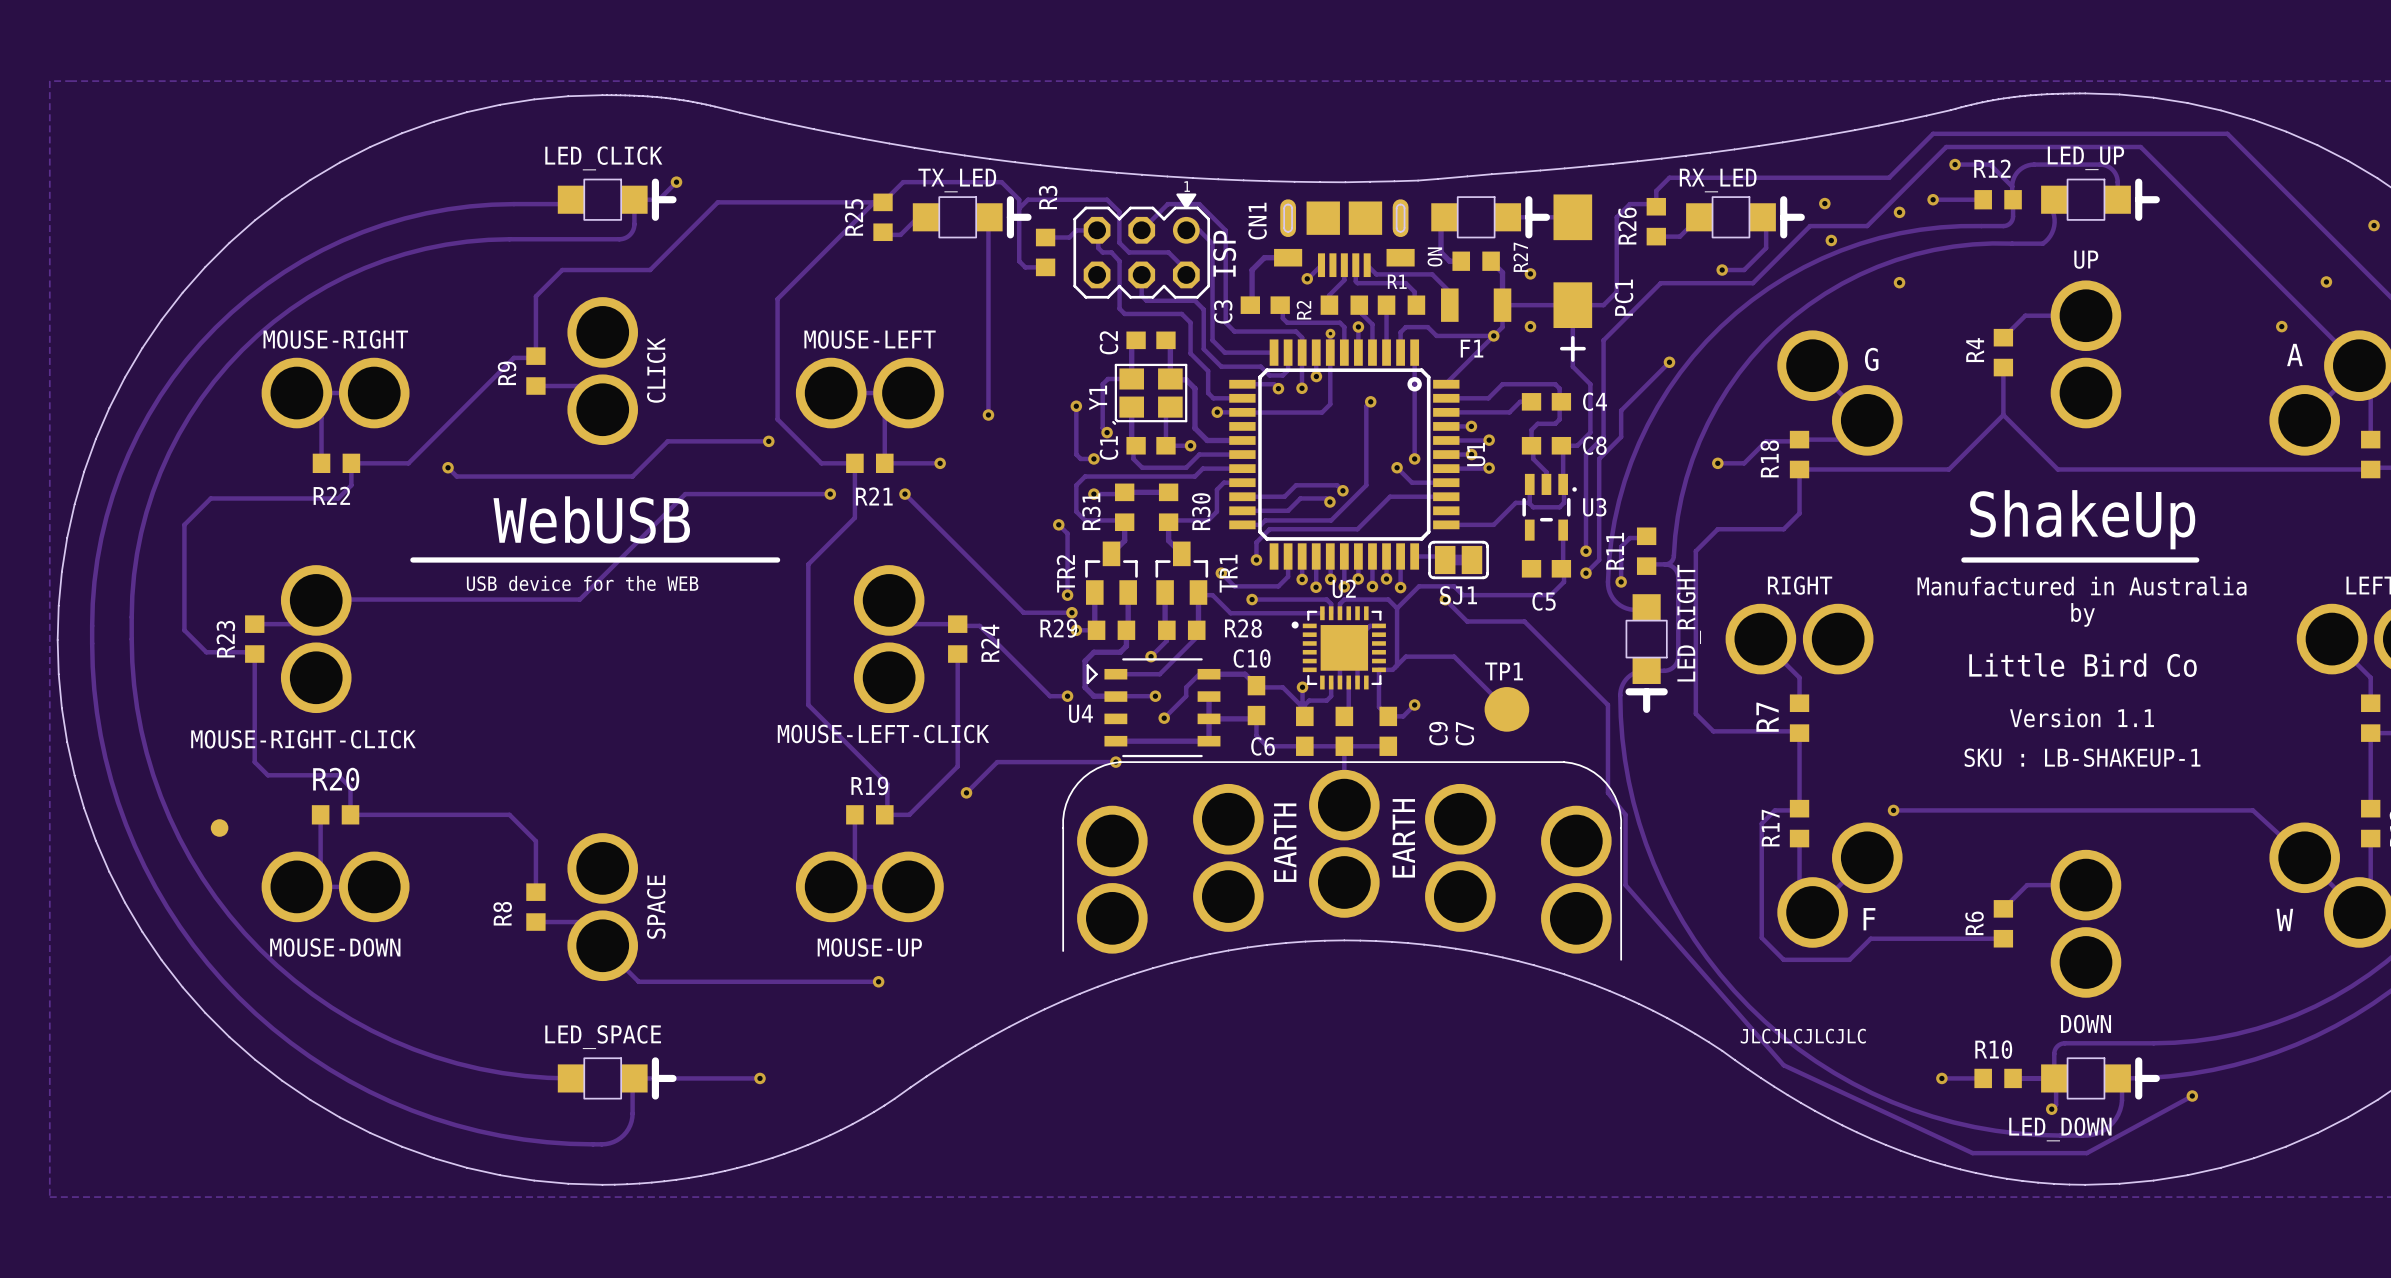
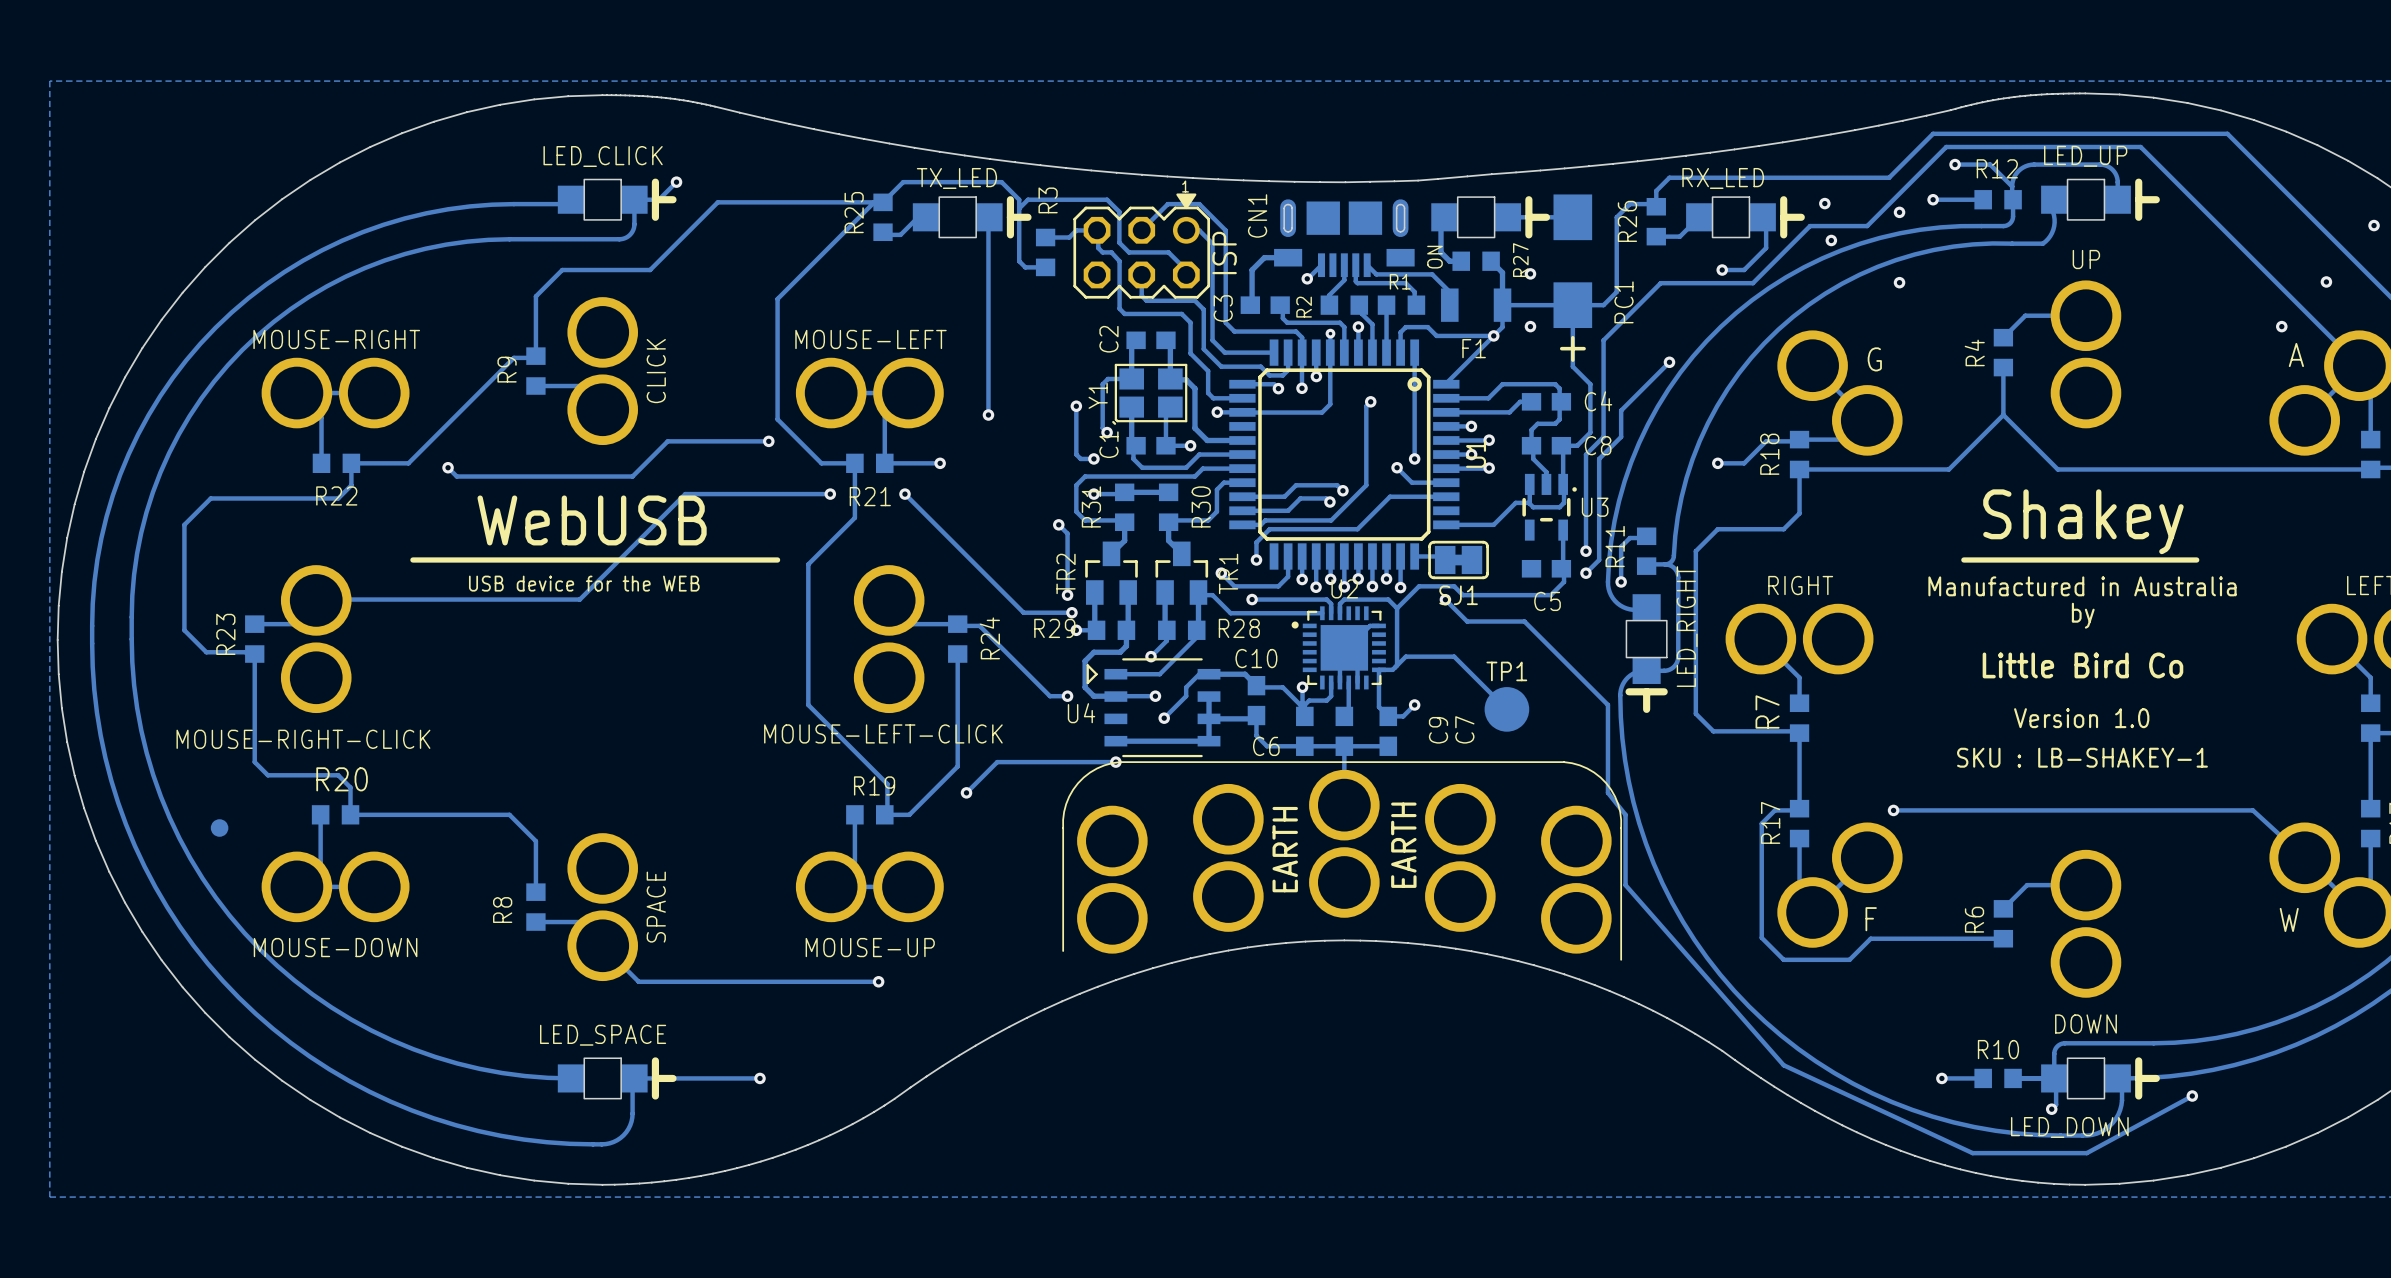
text: ShakeUp (2082, 519) -> Shakey (2083, 521)
text: Version 1.1 (2082, 717) -> Version 1.0 (2081, 718)
text: SKU : LB-SHAKEUP-1 (2082, 757) -> SKU : LB-SHAKEY-1 (2082, 757)
text: JLCJLCJLCJLC (1803, 1036) -> none

